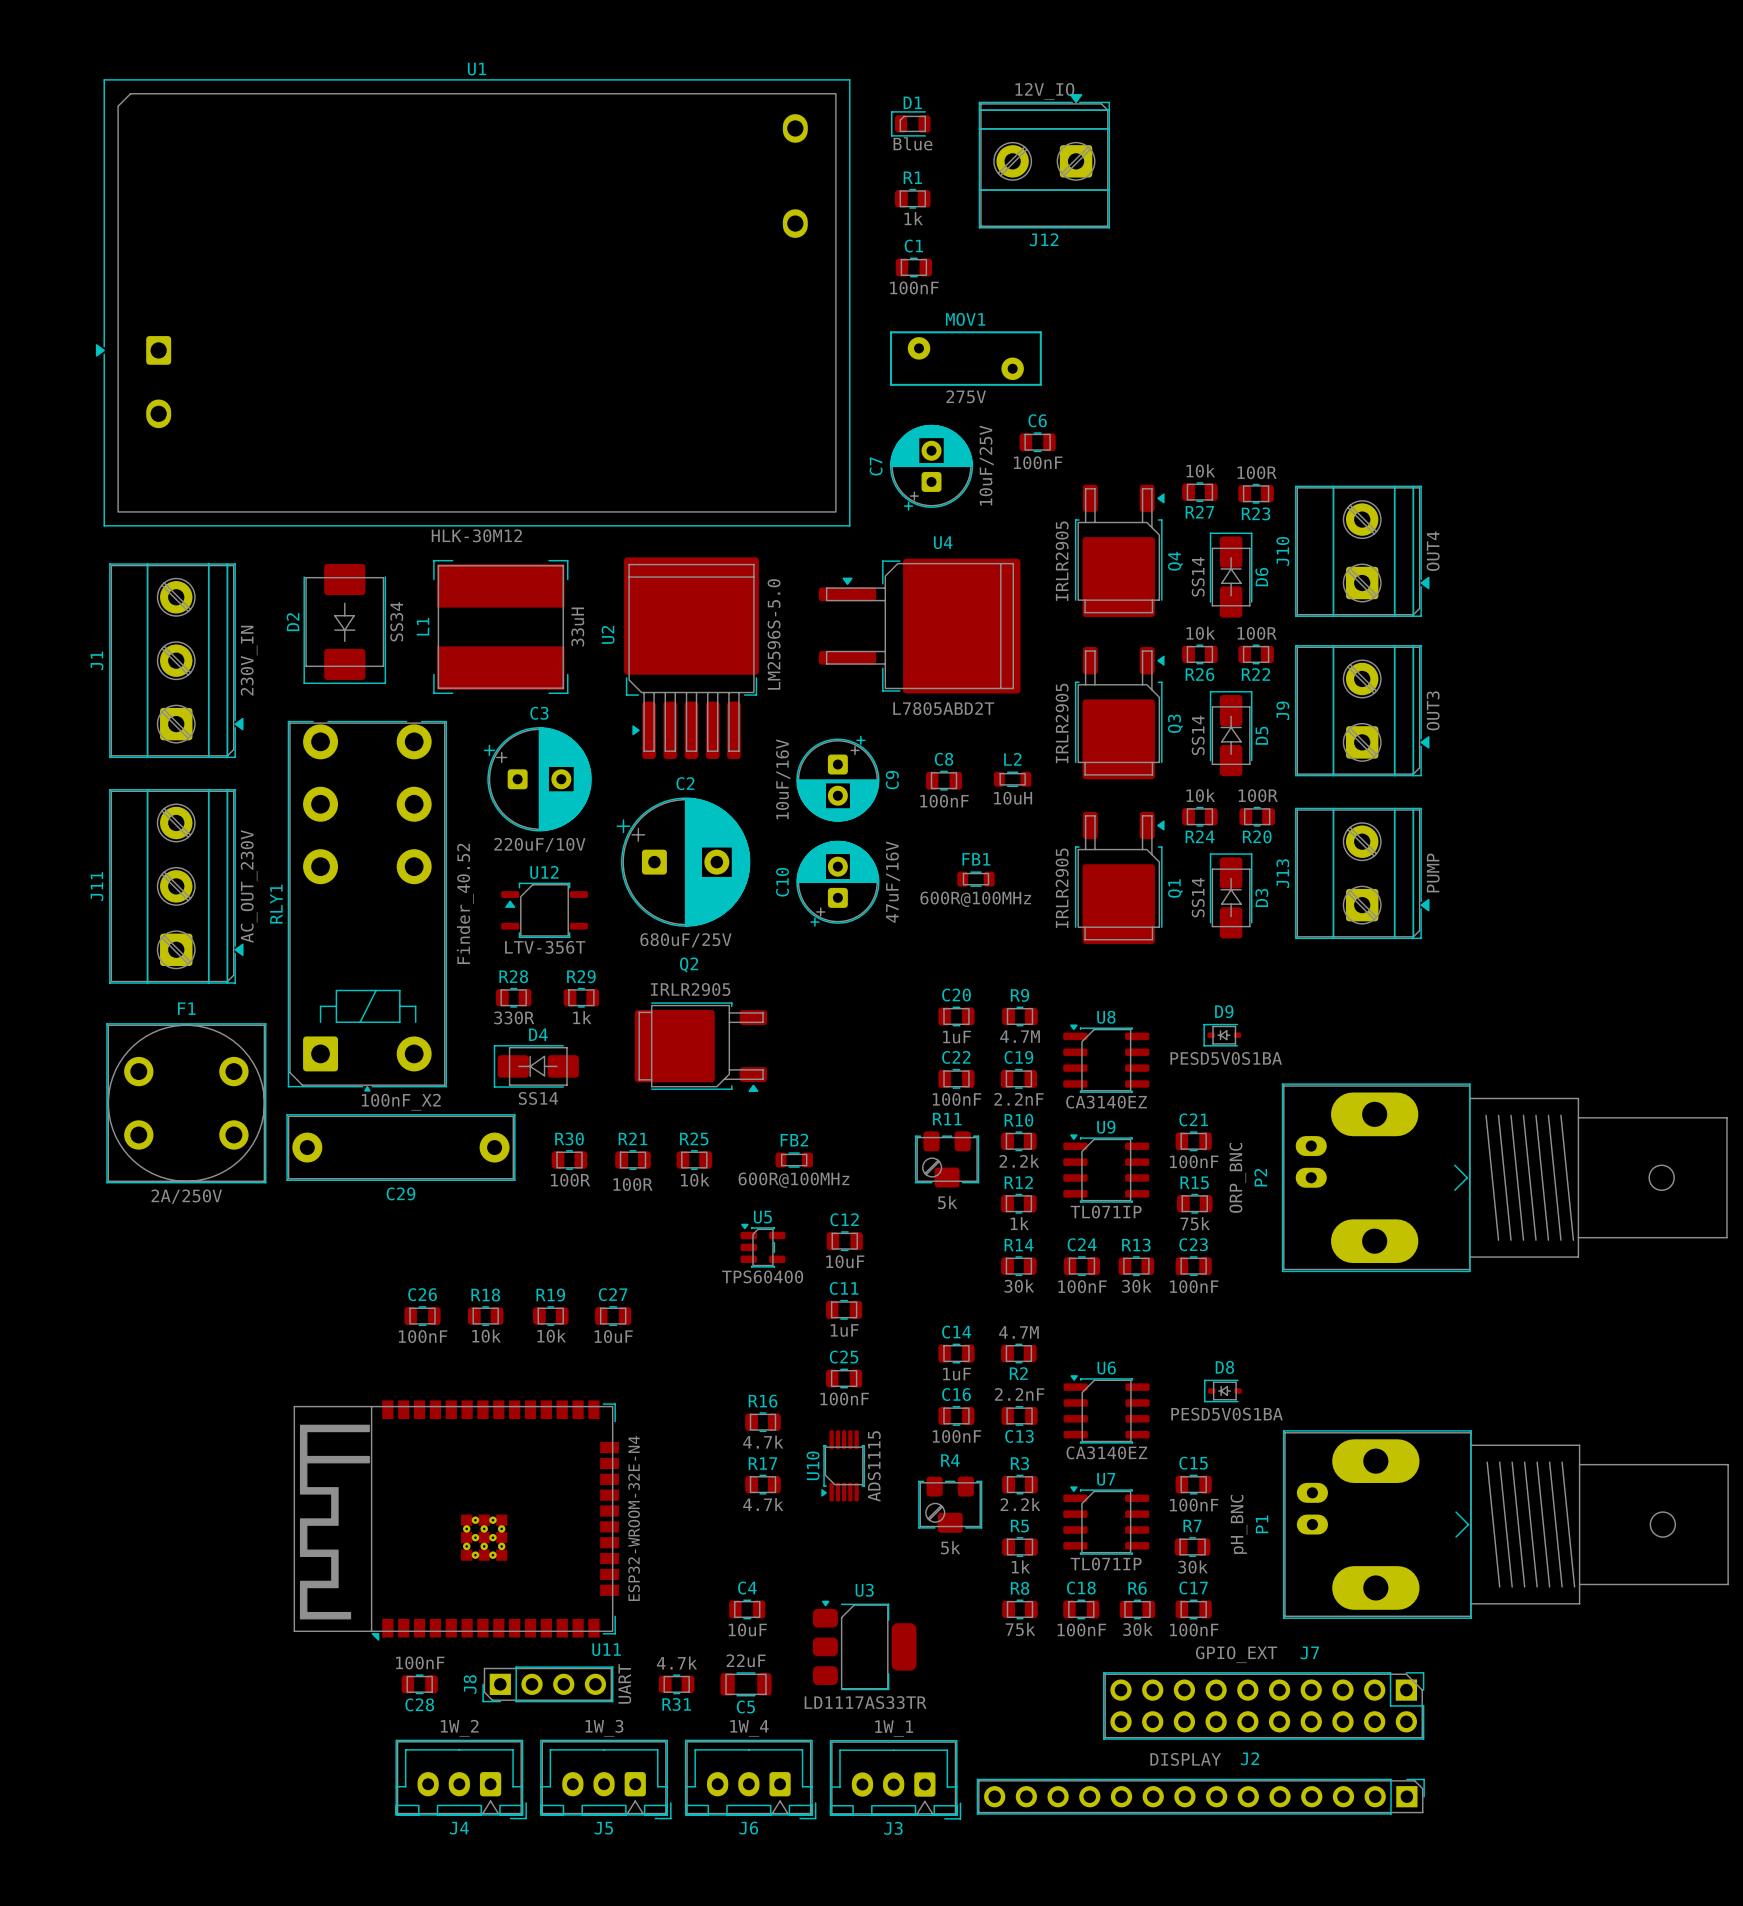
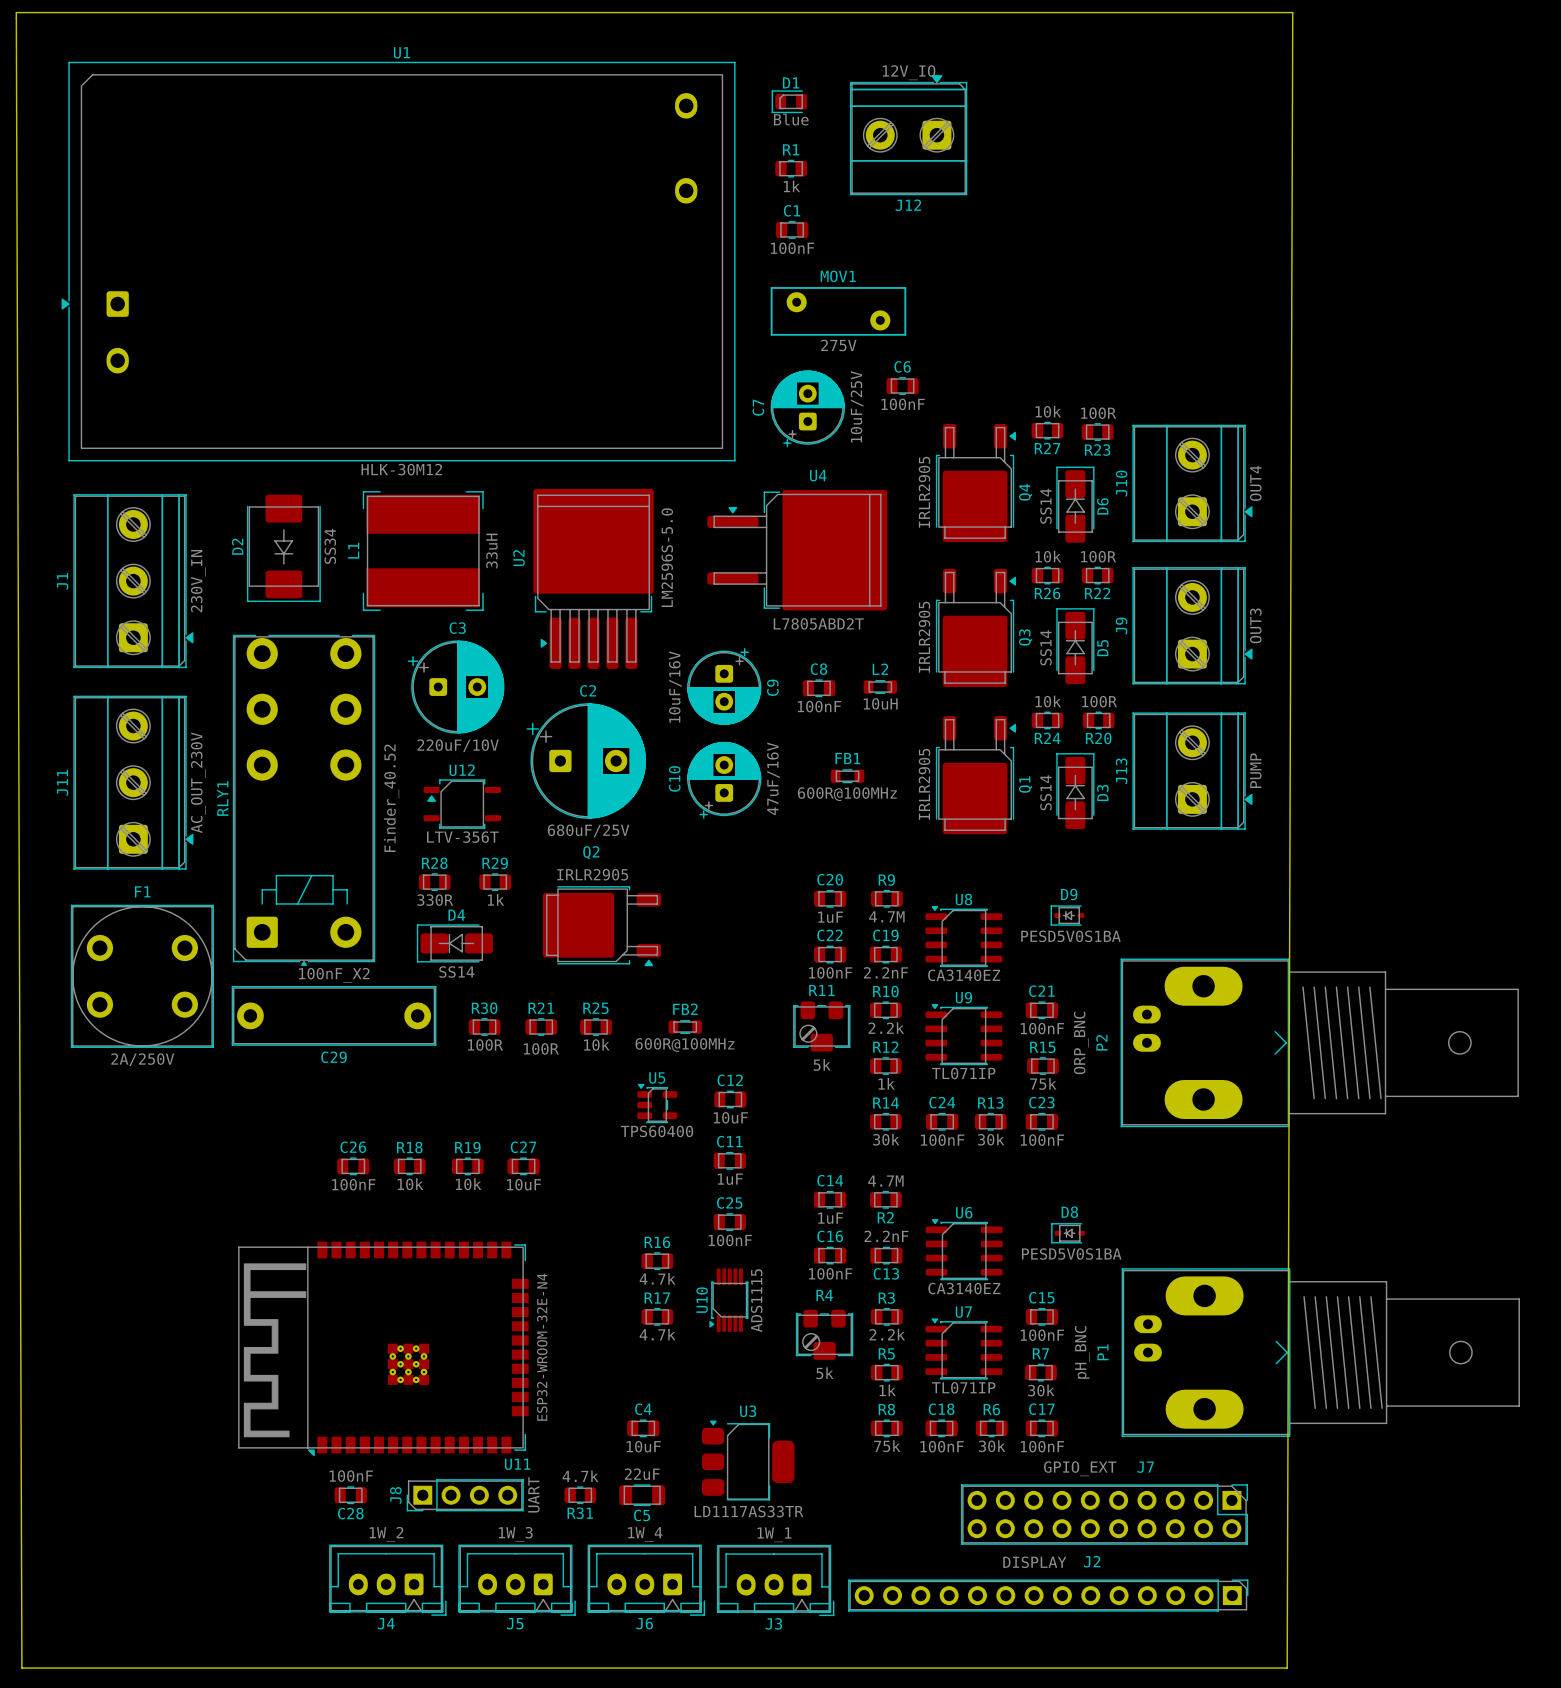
board edge: none -> (16, 12) (1292, 12) (1287, 1668) (21, 1668) (16, 12)

